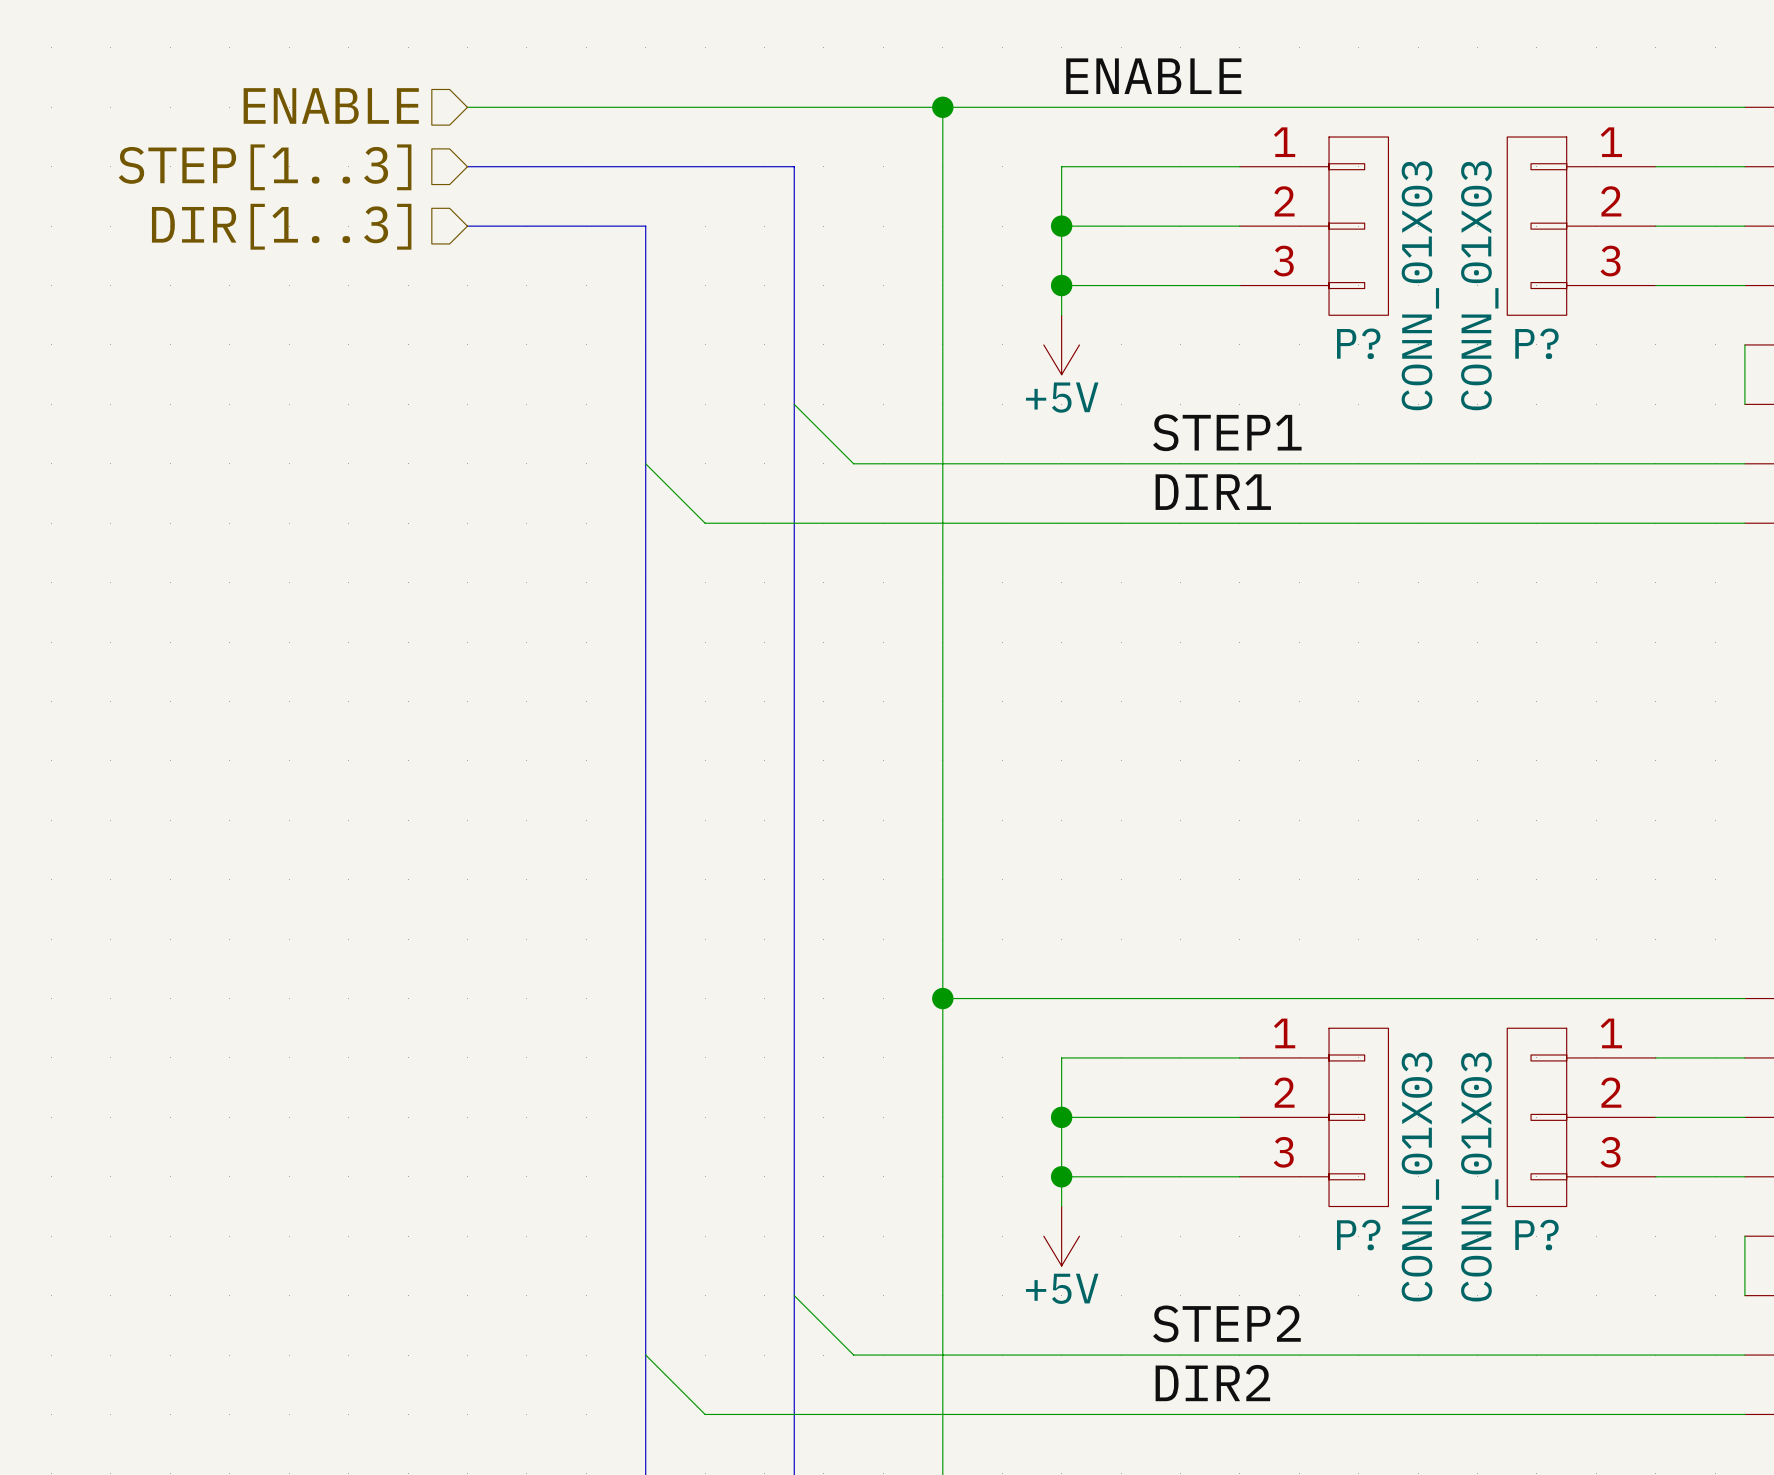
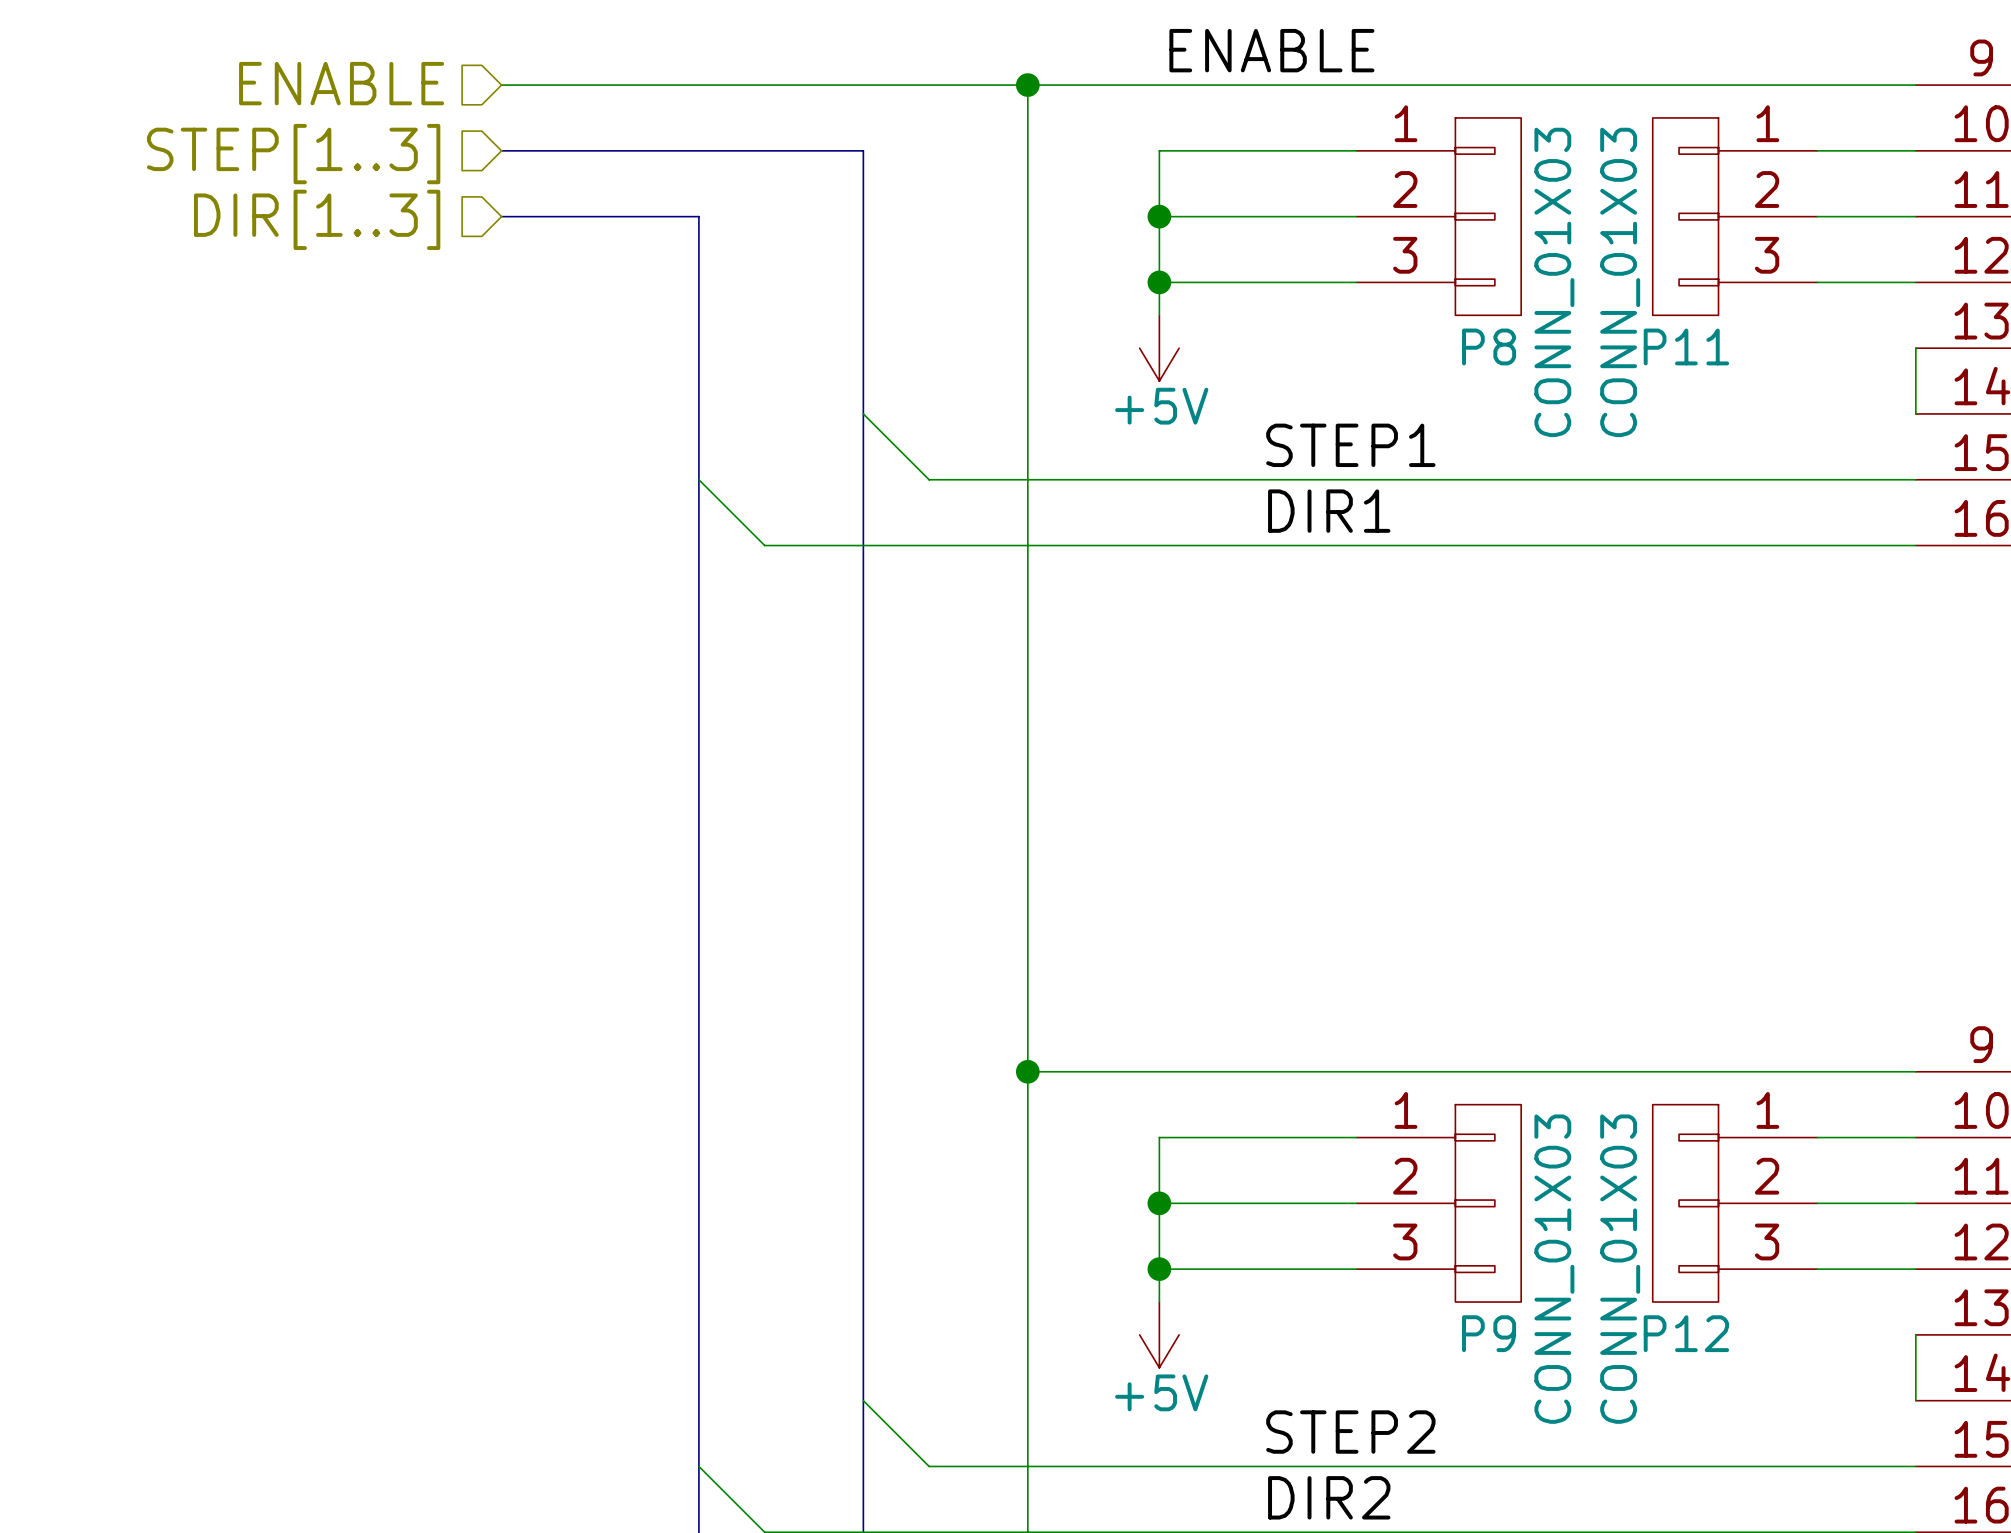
P? name: P? (1358, 343) -> P8 (1489, 346)
P? name: P? (1536, 343) -> P11 (1686, 346)
P? name: P? (1358, 1235) -> P9 (1489, 1333)
P? name: P? (1536, 1235) -> P12 (1686, 1333)

